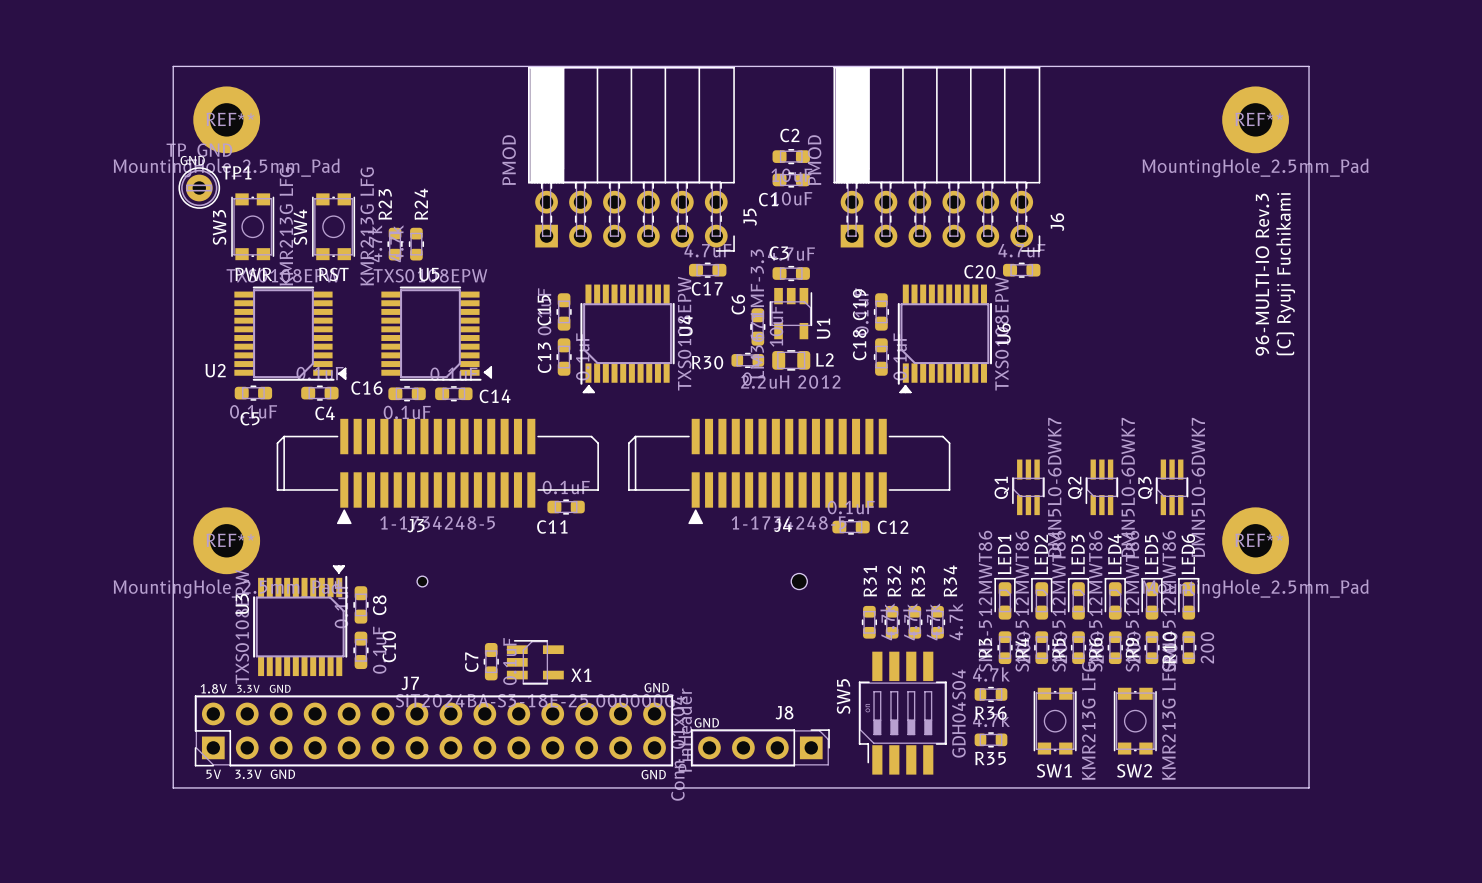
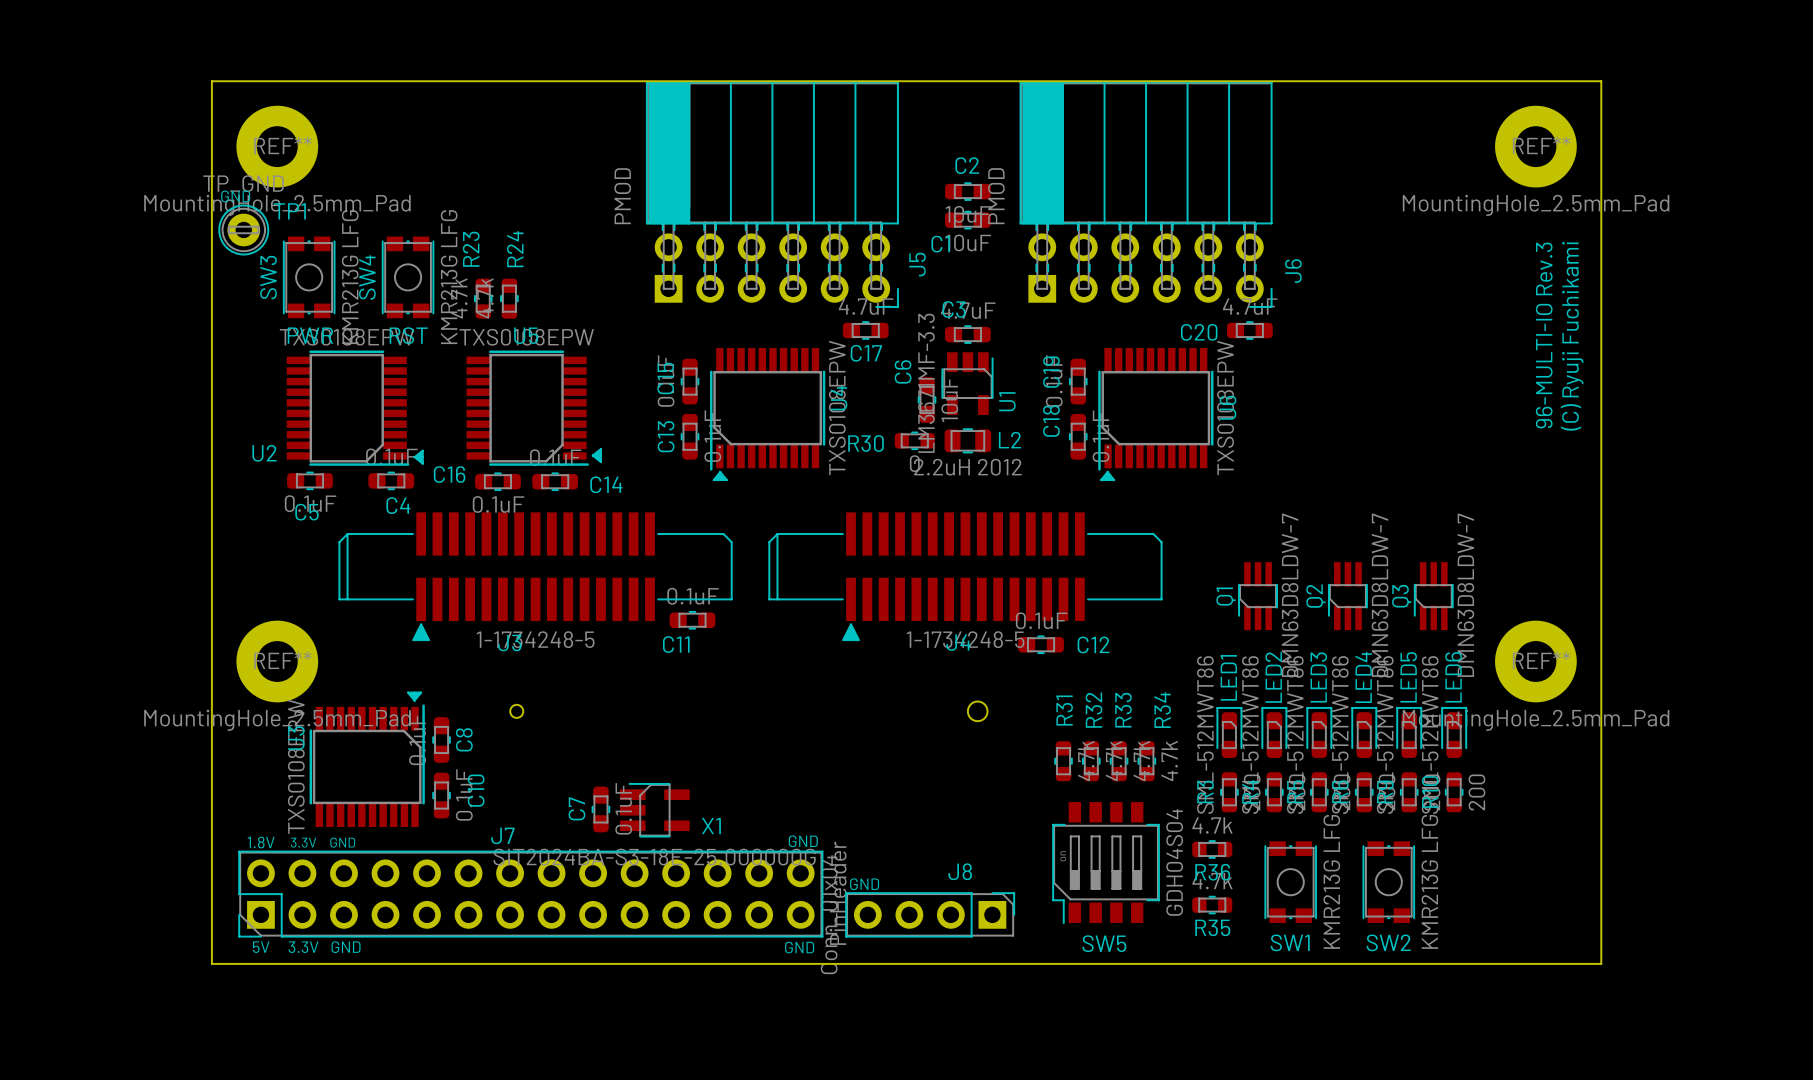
Q1 value: DMN5L0-6DWK7 (1054, 487) -> DMN63D8LDW-7 (1290, 595)
Q2 value: DMN5L0-6DWK7 (1128, 487) -> DMN63D8LDW-7 (1379, 595)
Q3 value: DMN5L0-6DWK7 (1198, 487) -> DMN63D8LDW-7 (1465, 595)
SW5 footprint: [858, 651, 947, 775] -> [1052, 802, 1160, 925]
SW5 name position: SW5 (843, 696) -> SW5 (1104, 943)

